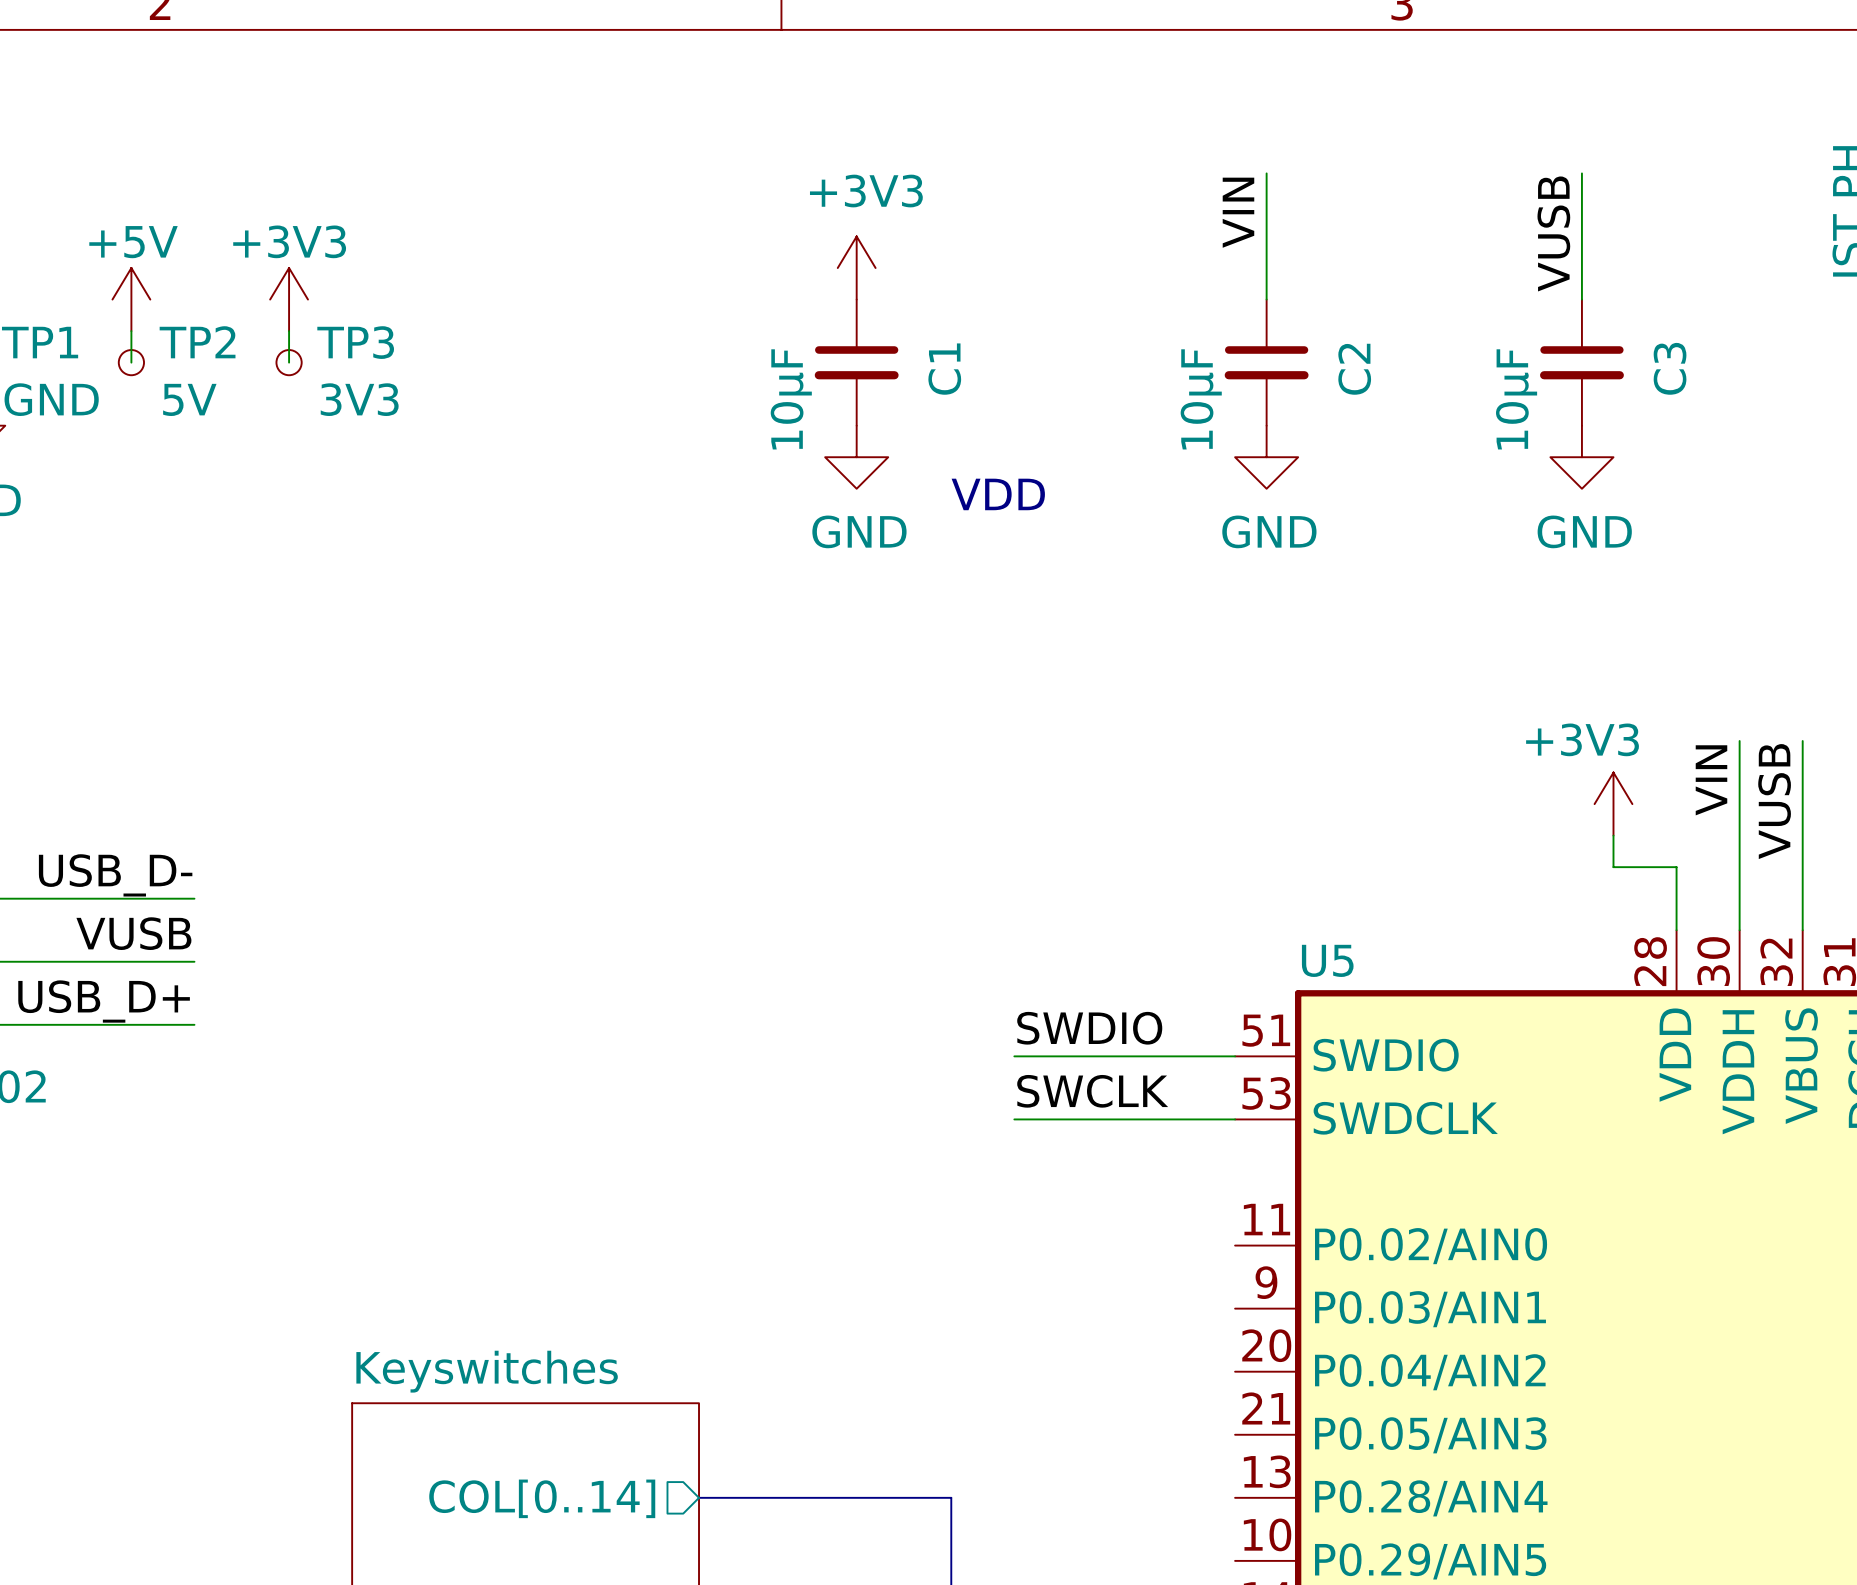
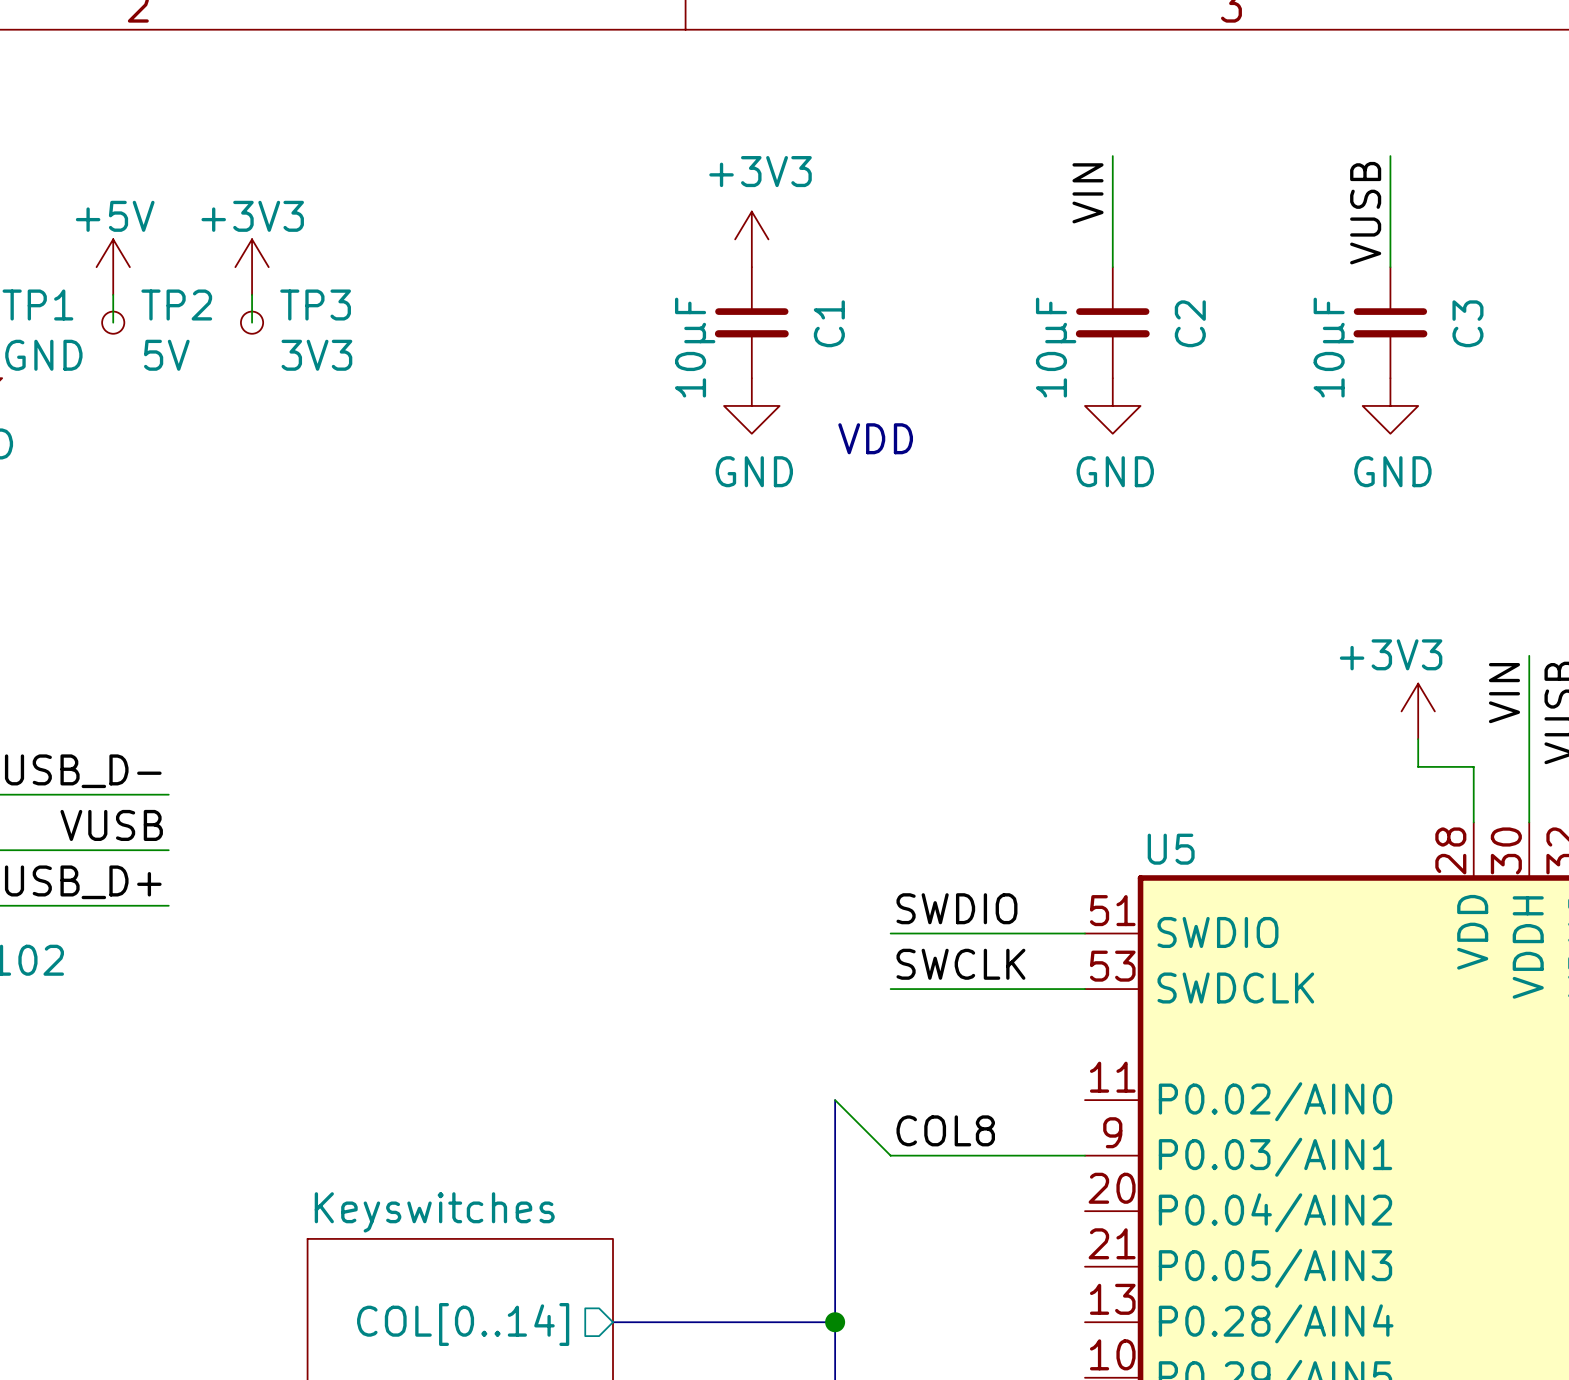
wire: none -> (835, 1100) (890, 1155) (1085, 1155)
bus: none -> (835, 1100) (835, 1322)
label: none -> COL8 (945, 1130)
junction: none -> (835, 1322)

